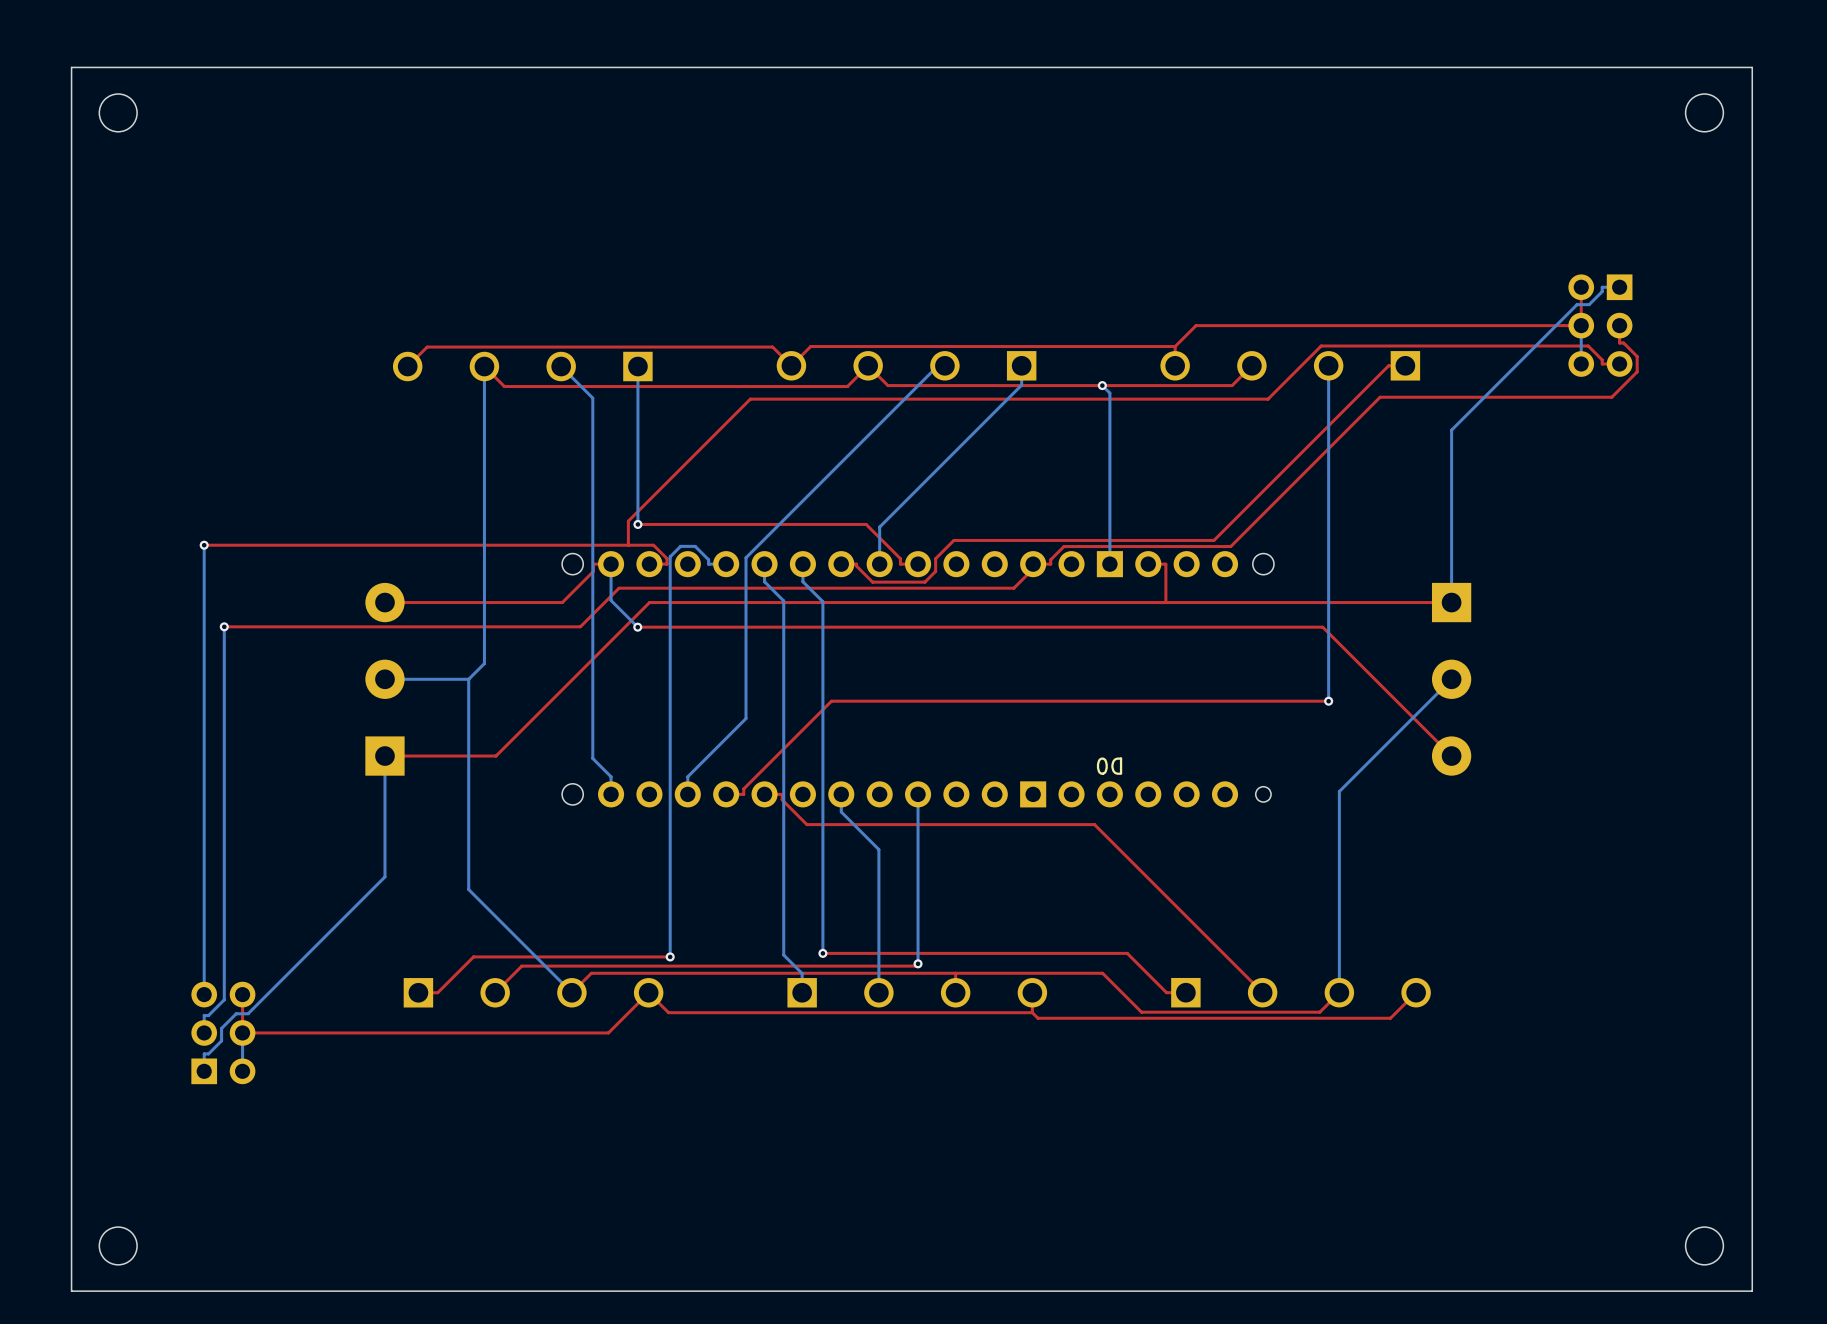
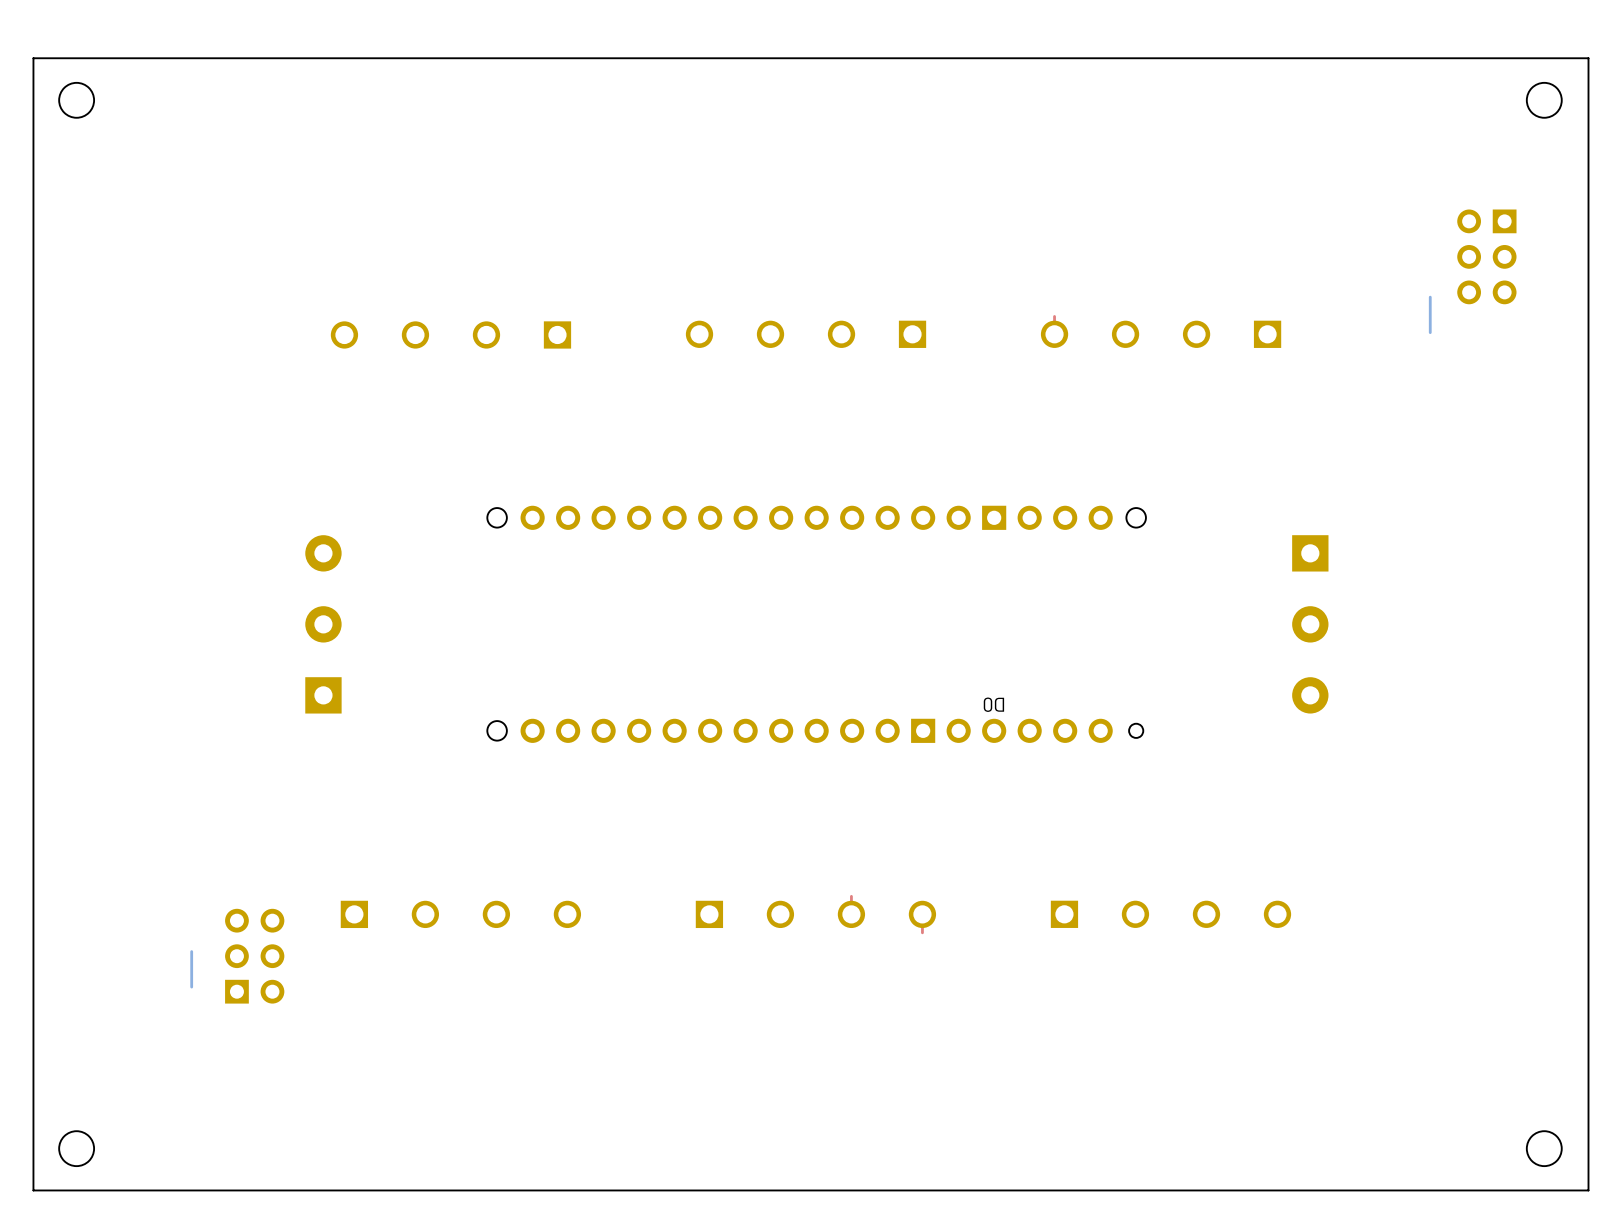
top track: (1581, 287) (1581, 325) (1196, 325) (1175, 346) (810, 346) (791, 365) (772, 347) (427, 347) (407, 366) -> none
bottom track: (1619, 287) (1602, 287) (1602, 291) (1589, 304) (1577, 304) (1451, 430) (1451, 602) -> none
part position: (1600, 325) -> (1486, 256)
top track: (1619, 325) (1619, 343) (1623, 343) (1637, 356) (1637, 371) (1611, 397) (1380, 397) (1230, 546) (1063, 546) (1050, 559) (1050, 564) (1033, 564) -> none
top track: (1619, 364) (1602, 364) (1602, 359) (1588, 346) (1321, 346) (1268, 399) (750, 399) (628, 521) (628, 545) -> none
bottom track: (944, 365) (937, 365) (746, 557) (746, 718) (687, 776) (687, 794) -> none
bottom track: (1021, 365) (1021, 385) (879, 527) (879, 564) -> none
top track: (1251, 365) (1232, 385) (887, 385) (868, 365) (847, 386) (504, 386) (484, 366) -> none
bottom track: (1328, 365) (1328, 701) -> none
top track: (1405, 365) (1388, 365) (1213, 540) (953, 540) (935, 558) (935, 571) (924, 582) (872, 582) (856, 564) (841, 564) -> none
bottom track: (484, 366) (484, 663) (468, 679) -> none
bottom track: (561, 366) (592, 398) (592, 758) (611, 776) (611, 794) -> none
bottom track: (637, 366) (637, 524) -> none
bottom track: (1102, 385) (1109, 393) (1109, 564) -> none
via: (1102, 385) -> none
top track: (637, 524) (866, 524) (900, 558) (900, 564) (918, 564) -> none
via: (637, 524) -> none
top track: (204, 545) (653, 545) (667, 558) (667, 564) (649, 564) -> none
bottom track: (204, 545) (204, 994) -> none
via: (204, 545) -> none
top track: (611, 564) (593, 564) (593, 571) (562, 602) (384, 602) -> none
bottom track: (611, 564) (611, 600) (637, 627) -> none
bottom track: (726, 564) (708, 564) (708, 559) (695, 546) (680, 546) (670, 556) (670, 956) -> none
bottom track: (764, 564) (764, 581) (783, 600) (783, 955) (802, 973) (802, 992) -> none
bottom track: (802, 564) (802, 581) (822, 601) (822, 953) -> none
top track: (1037, 564) (1013, 588) (619, 588) (580, 626) (224, 626) -> none
top track: (1148, 564) (1165, 564) (1165, 602) -> none
top track: (1451, 602) (649, 602) (496, 756) (384, 756) -> none
bottom track: (224, 626) (224, 999) (208, 1015) (204, 1015) (204, 1032) -> none
via: (224, 626) -> none
top track: (637, 627) (1322, 627) (1451, 756) -> none
via: (637, 627) -> none
bottom track: (468, 679) (468, 889) (571, 992) -> none
bottom track: (468, 679) (384, 679) -> none
bottom track: (1451, 679) (1339, 791) (1339, 992) -> none
top track: (1328, 701) (831, 701) (743, 788) (743, 794) (726, 794) -> none
via: (1328, 701) -> none
bottom track: (384, 756) (384, 876) (248, 1013) (236, 1013) (221, 1028) (221, 1040) (208, 1053) (204, 1053) (204, 1071) -> none
top track: (764, 794) (782, 794) (782, 799) (806, 824) (1094, 824) (1262, 992) -> none
bottom track: (841, 794) (841, 811) (878, 849) (878, 992) -> none
bottom track: (918, 794) (918, 963) -> none
top track: (822, 953) (1127, 953) (1166, 992) (1185, 992) -> none
via: (822, 953) -> none
top track: (670, 956) (473, 956) (437, 992) (418, 992) -> none
via: (670, 956) -> none
top track: (918, 963) (915, 966) (521, 966) (495, 992) -> none
via: (918, 963) -> none
top track: (1339, 992) (1319, 1012) (1141, 1012) (1102, 973) (591, 973) (571, 992) -> none
top track: (1416, 992) (1390, 1018) (1037, 1018) (1032, 1012) (668, 1012) (648, 992) (608, 1032) (242, 1032) (242, 994) -> none
part position: (223, 1032) -> (254, 956)

